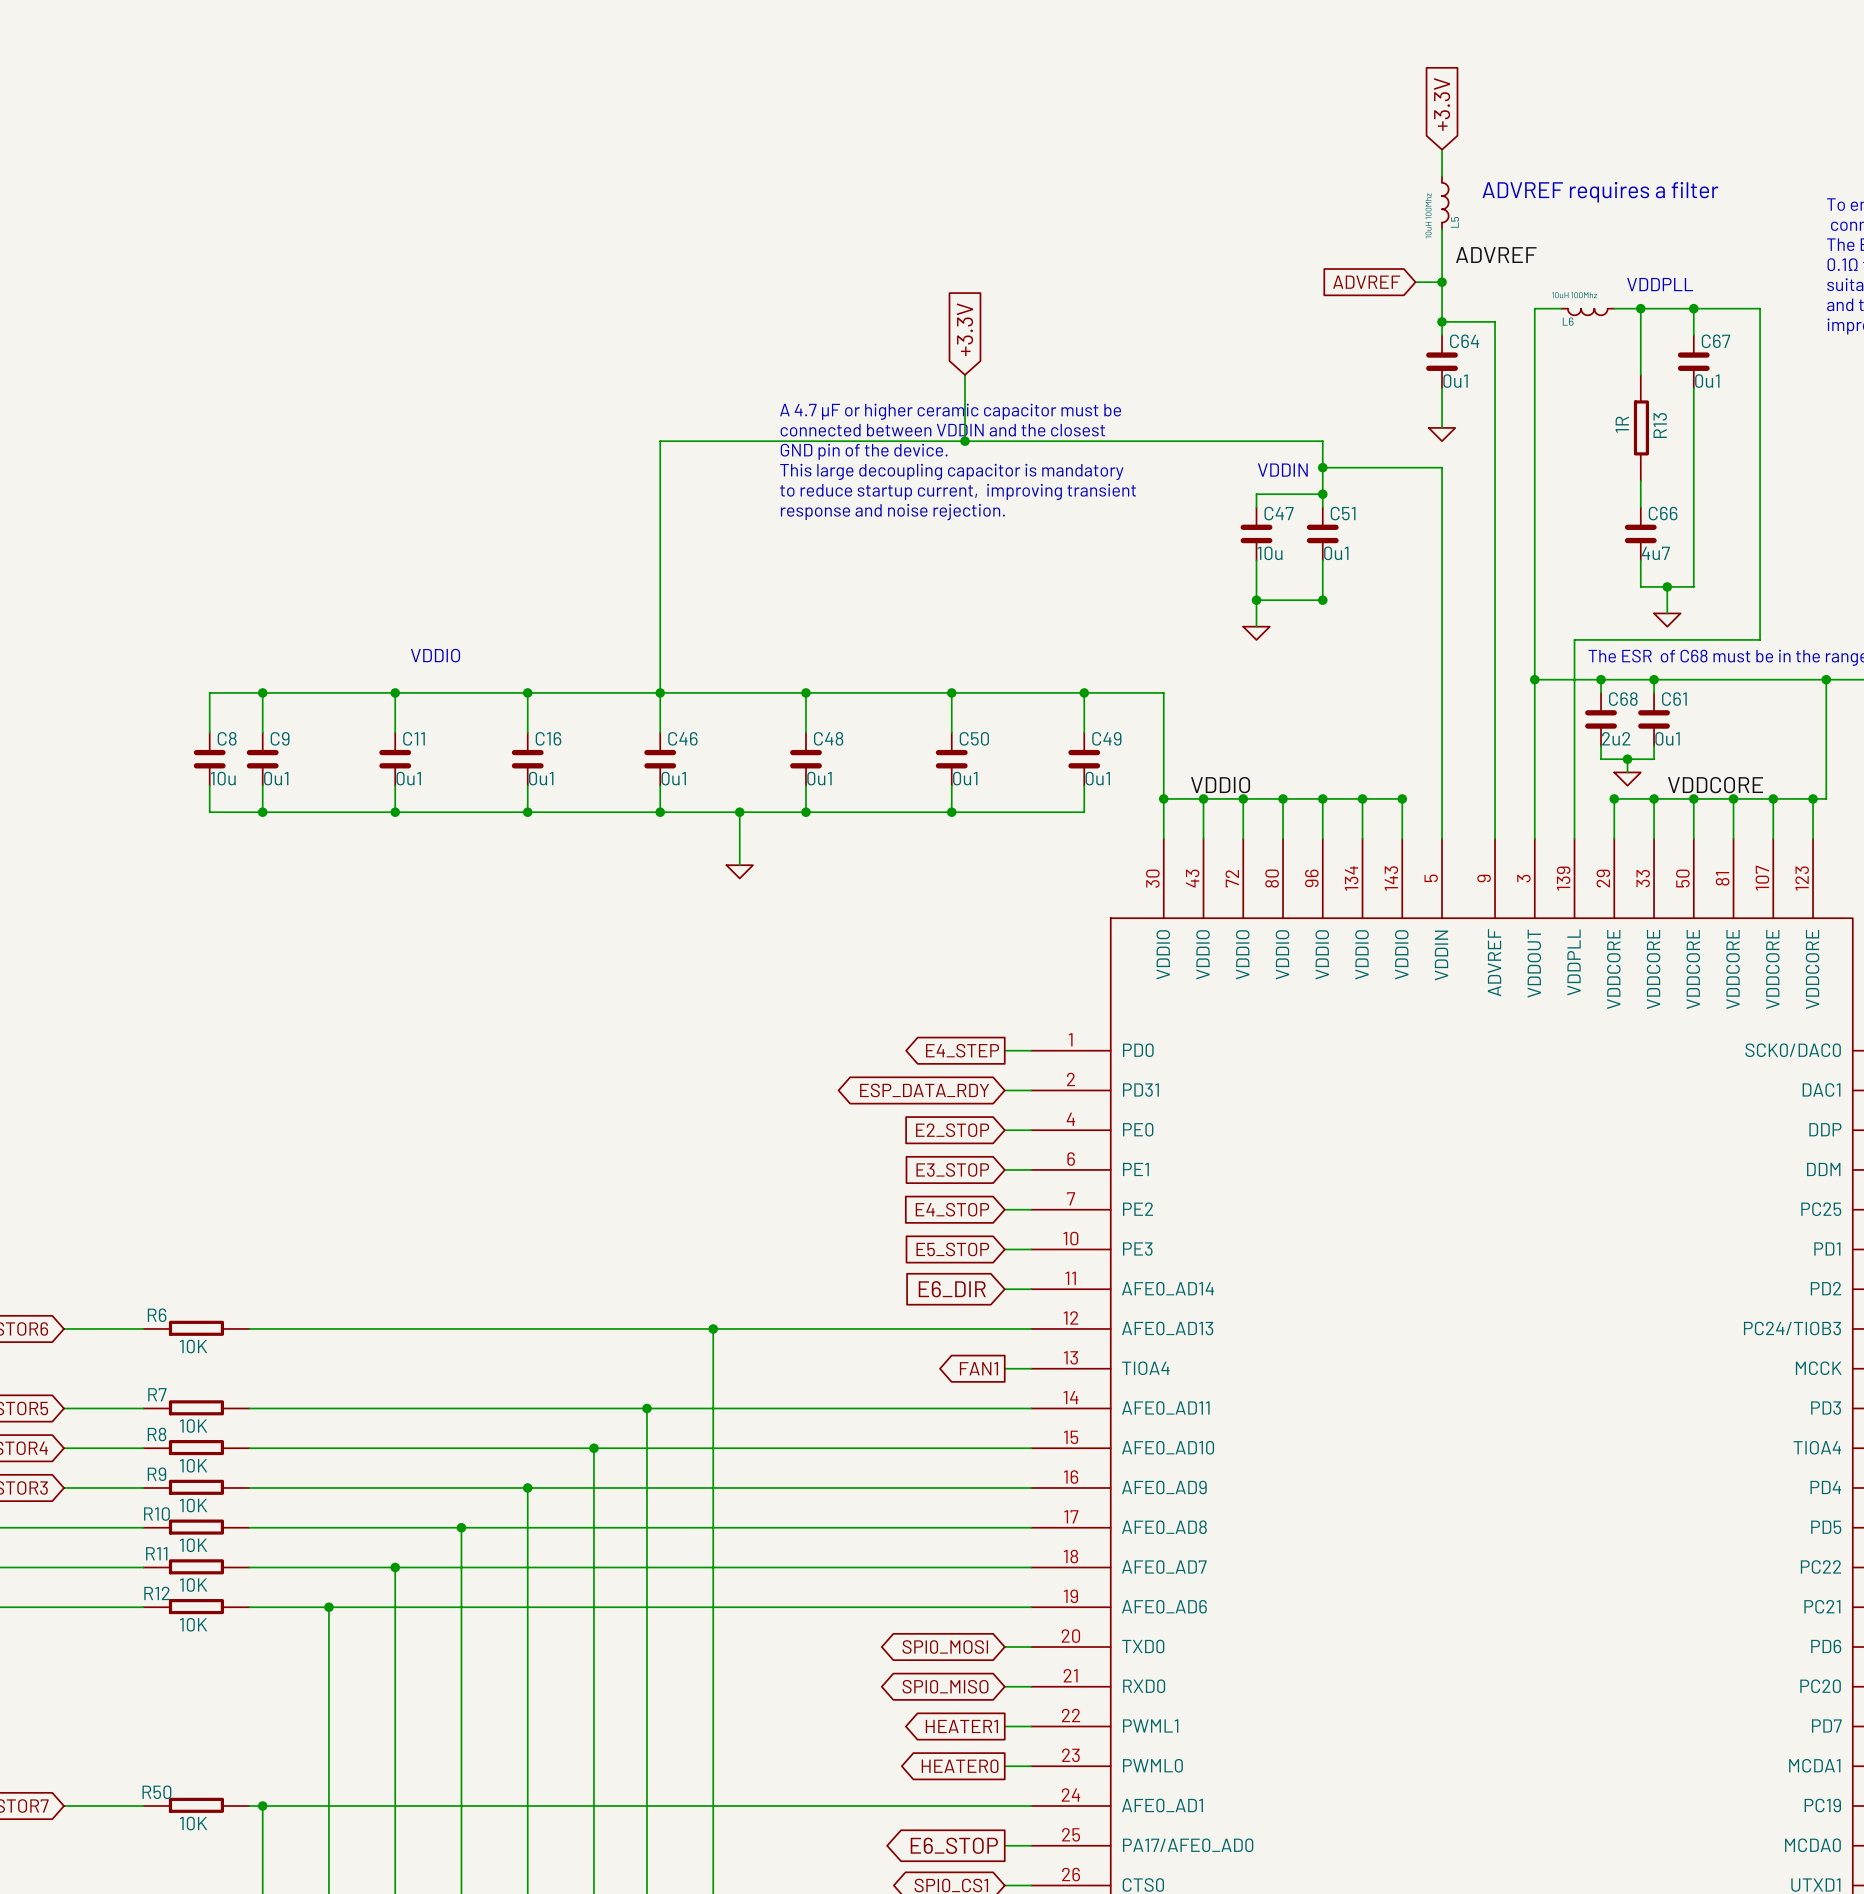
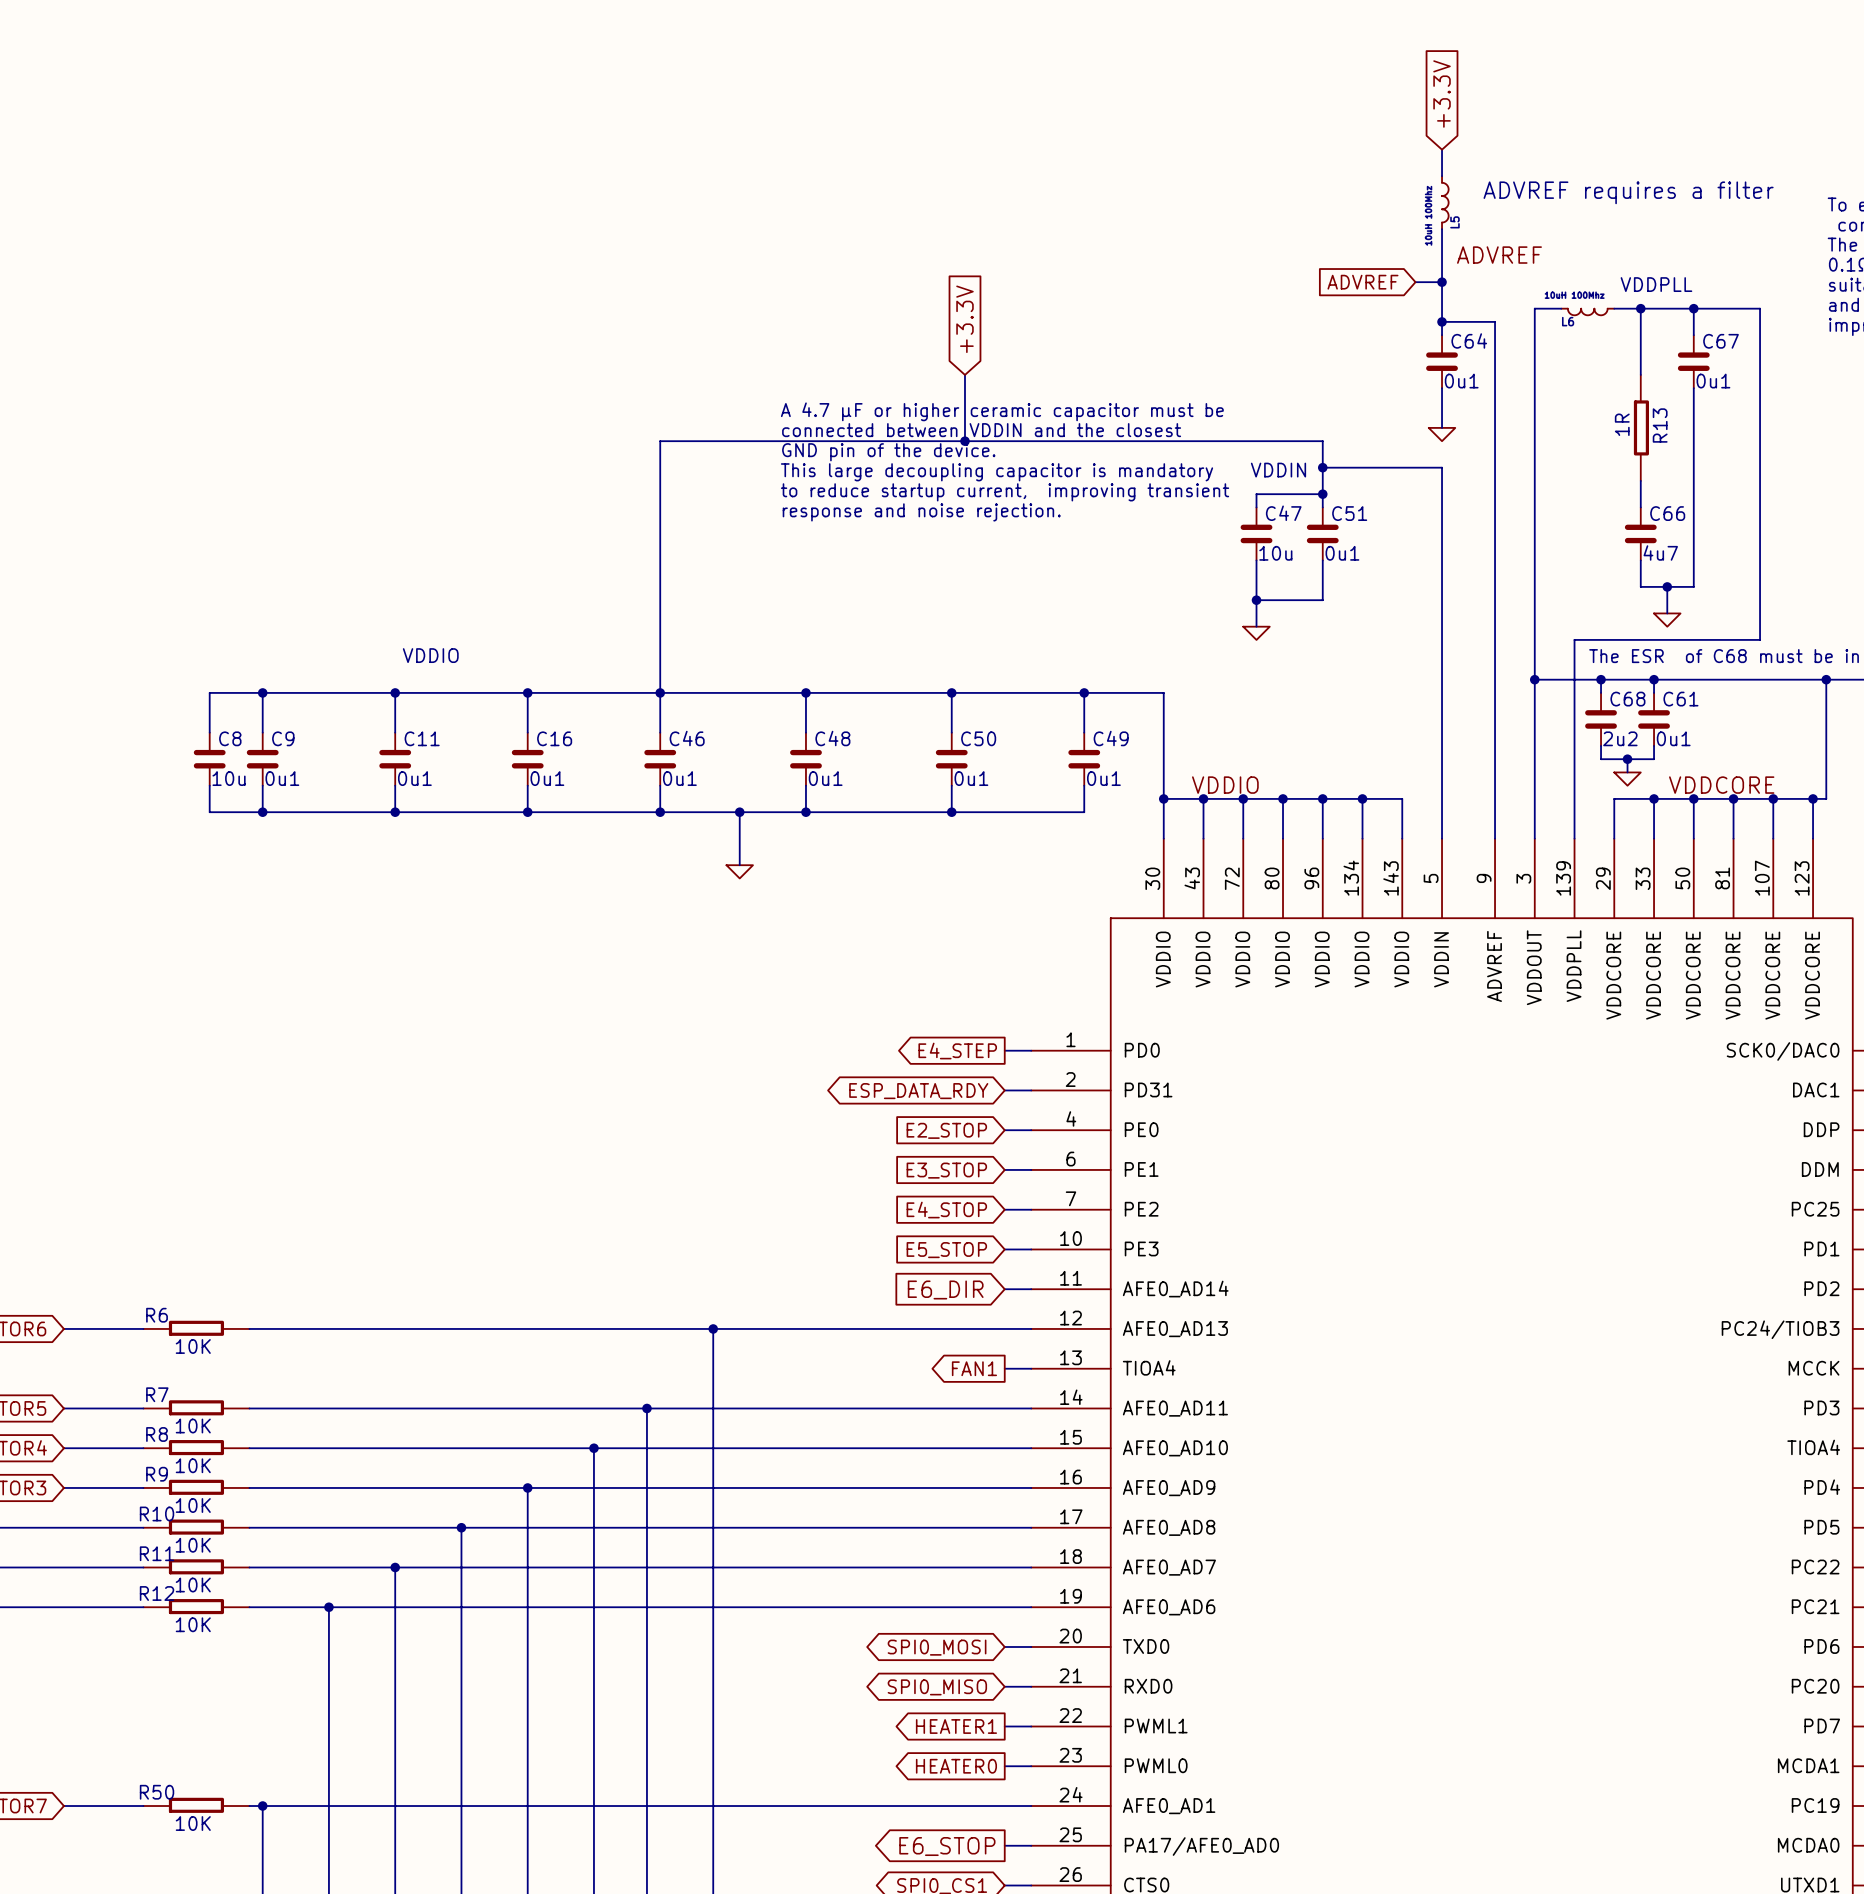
junction: (1322, 600) -> none
junction: (1402, 798) -> none
junction: (1614, 798) -> none

